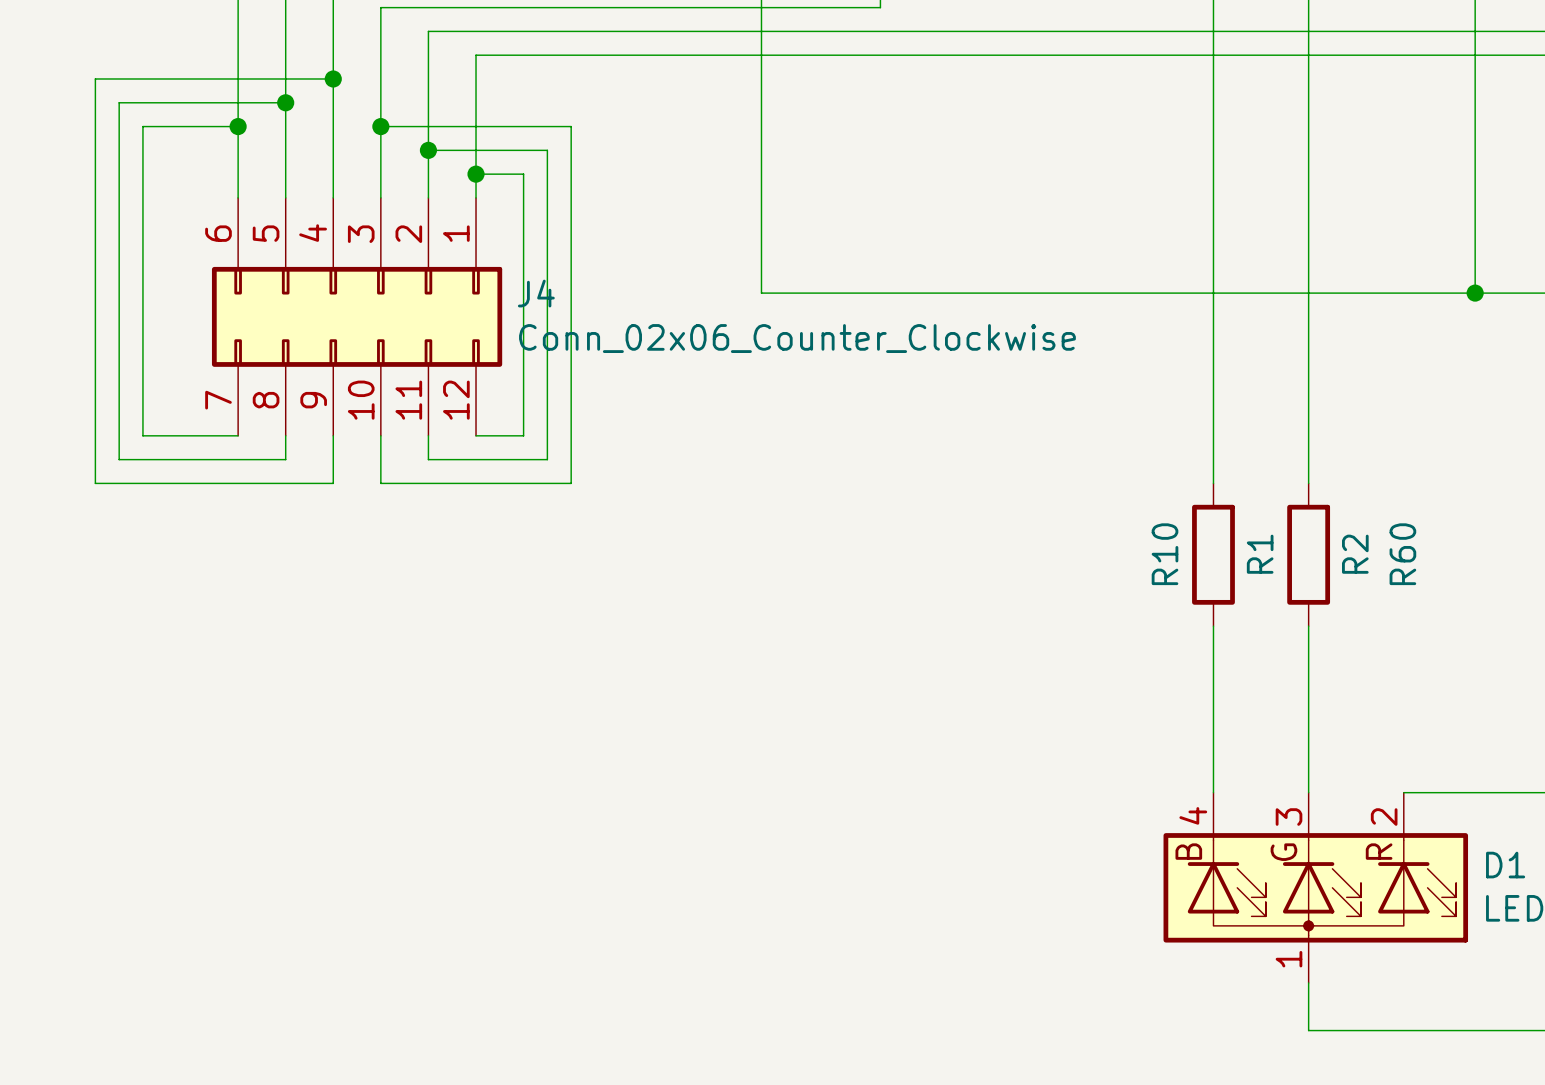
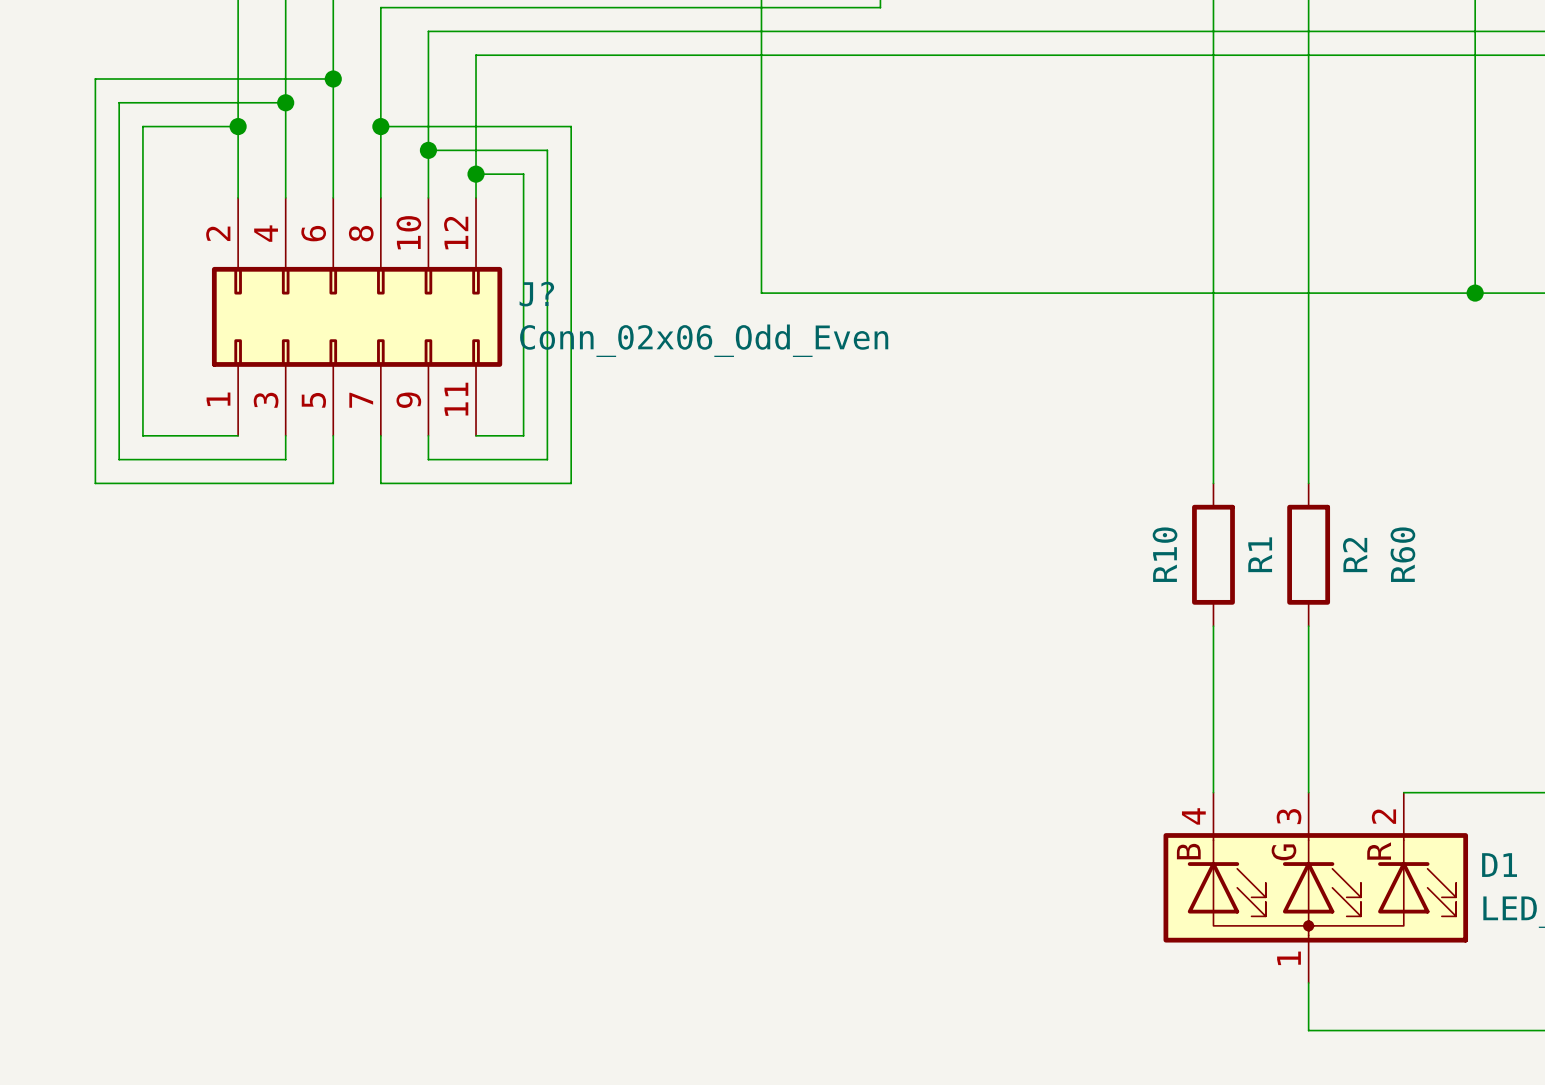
J4 symbol: [211, 197, 503, 436] -> [211, 197, 503, 436]
J4 name: J4 (536, 293) -> J? (536, 294)
J4 value: Conn_02x06_Counter_Clockwise (797, 338) -> Conn_02x06_Odd_Even (704, 340)

